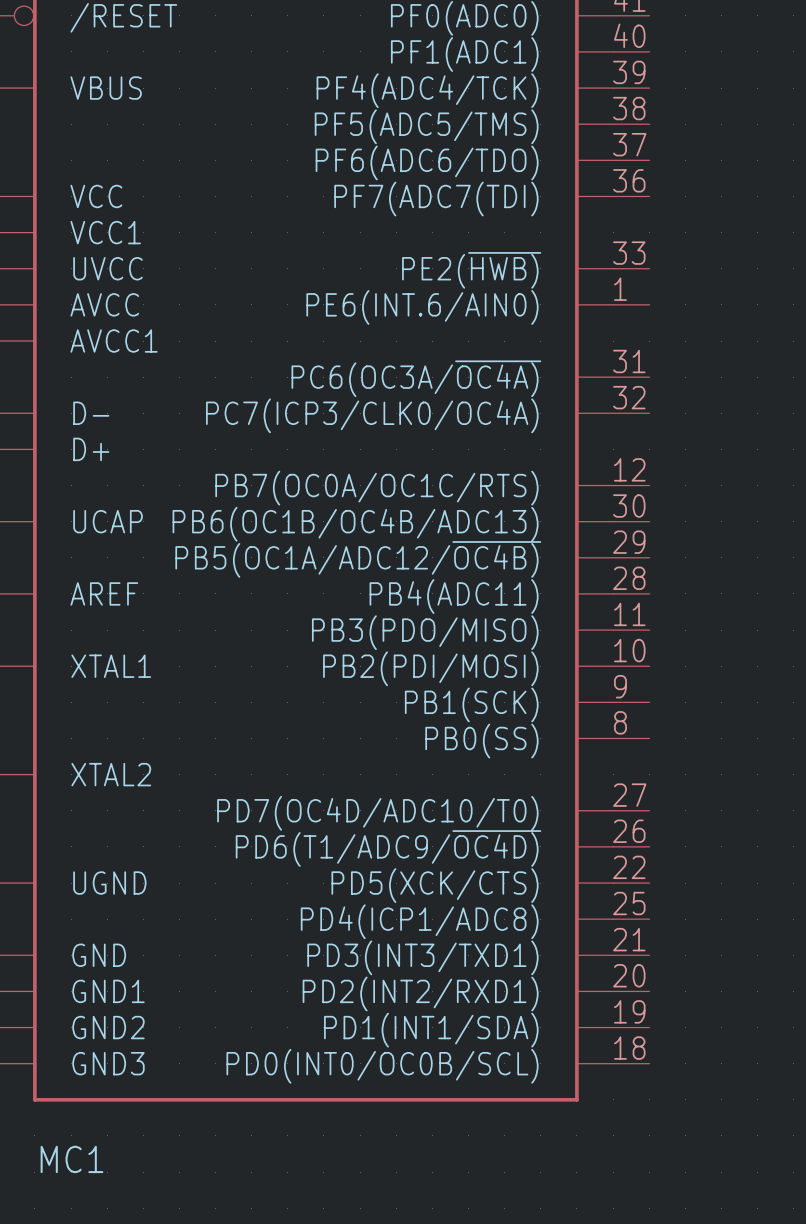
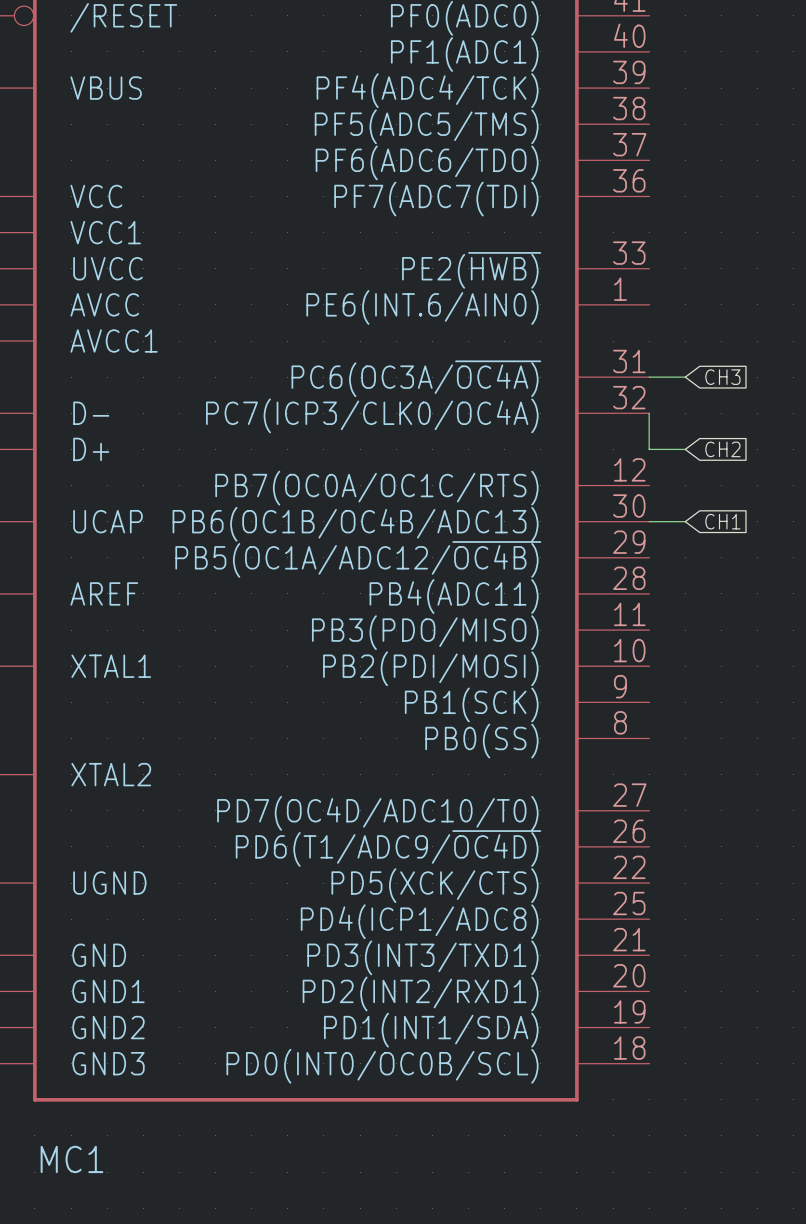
wire: none -> (649, 377) (685, 377)
global label: none -> CH3 (722, 377)
wire: none -> (649, 413) (649, 449) (685, 449)
global label: none -> CH2 (722, 449)
wire: none -> (649, 521) (685, 521)
global label: none -> CH1 (722, 521)

